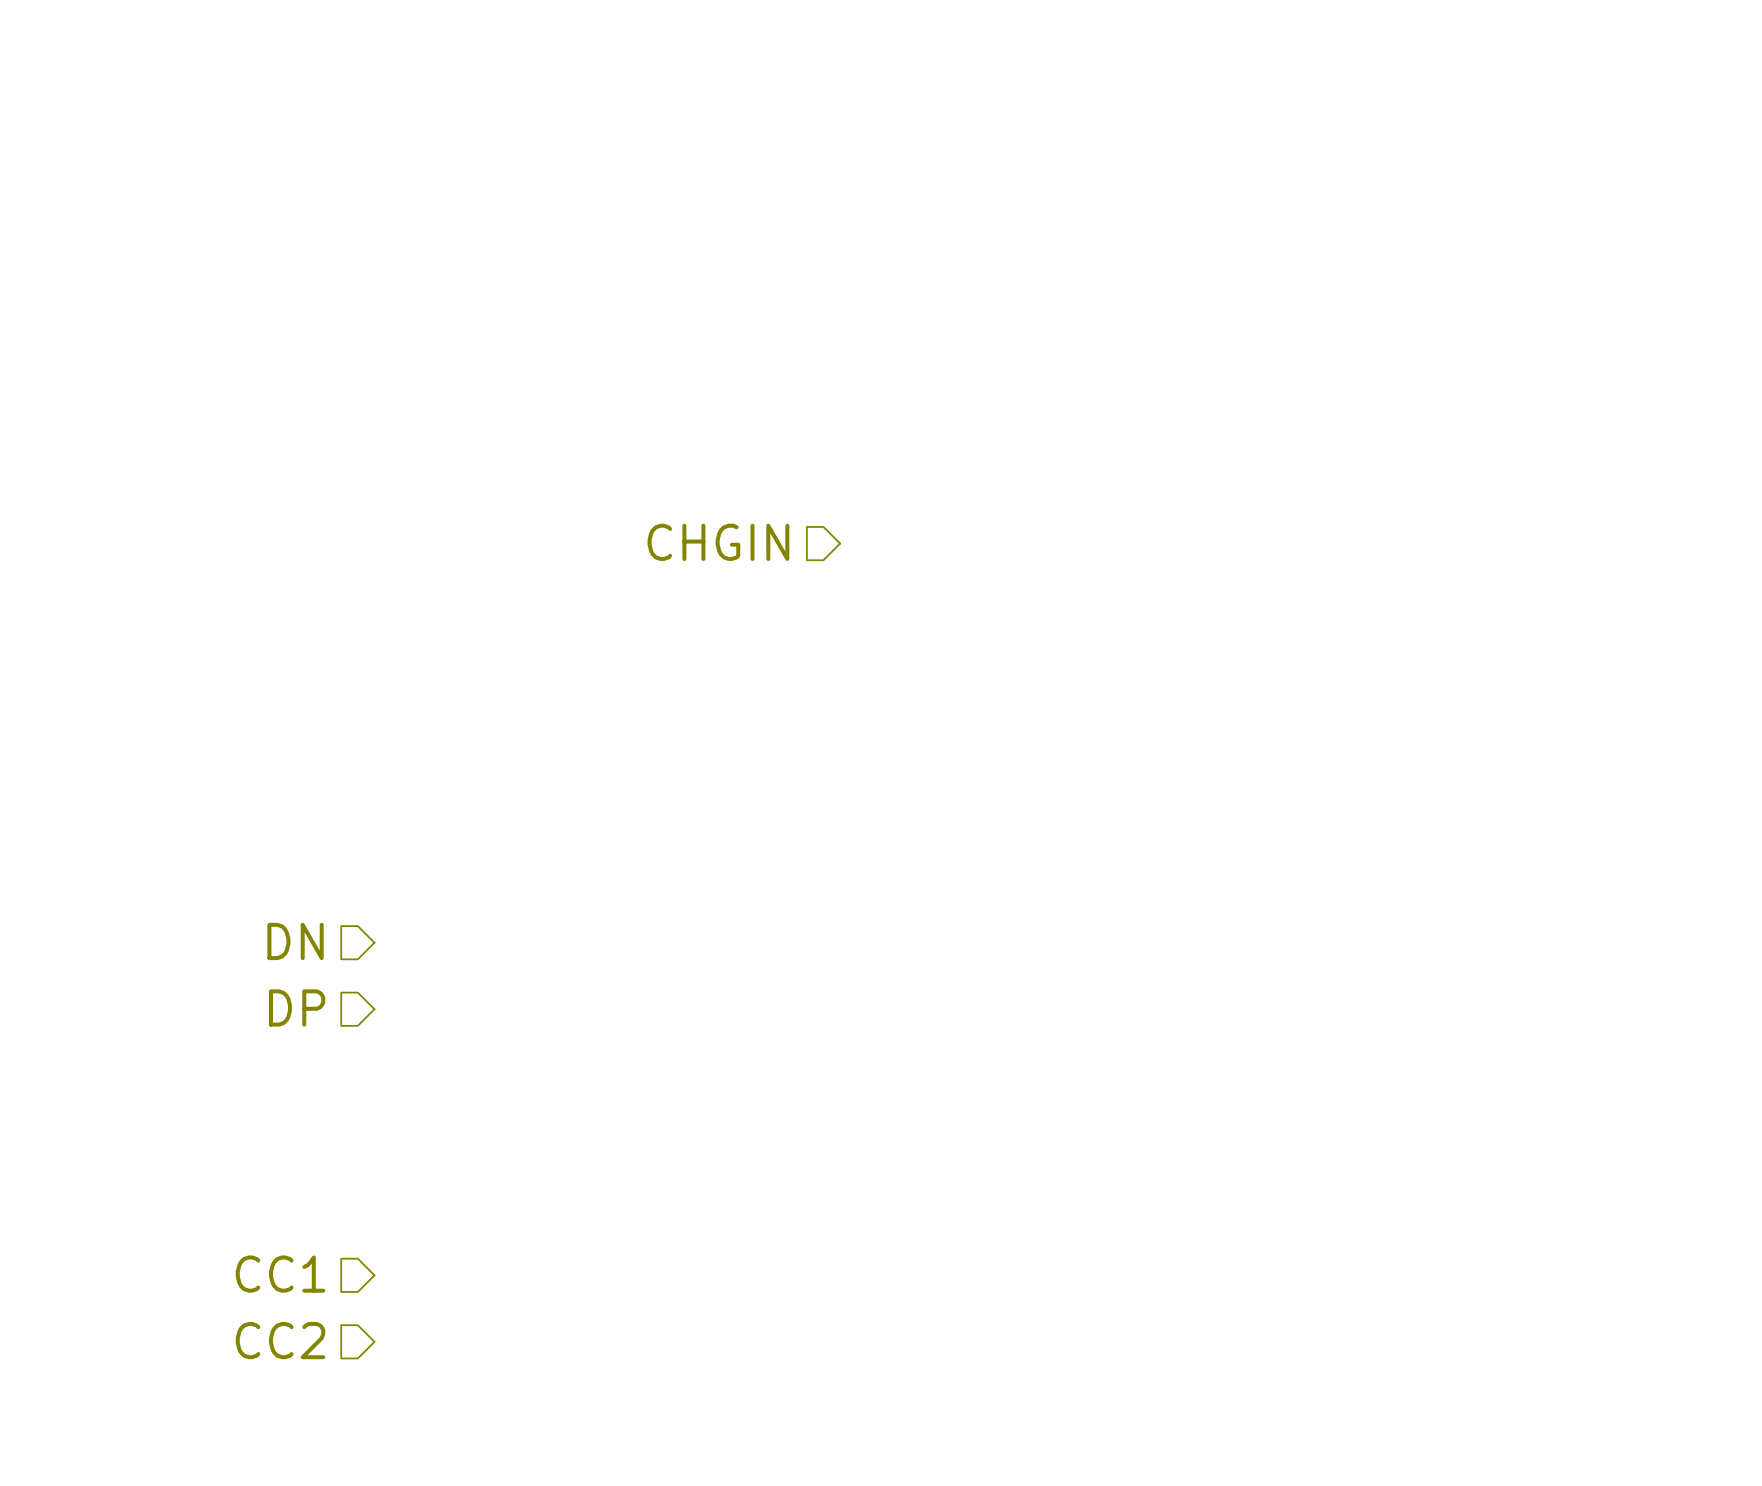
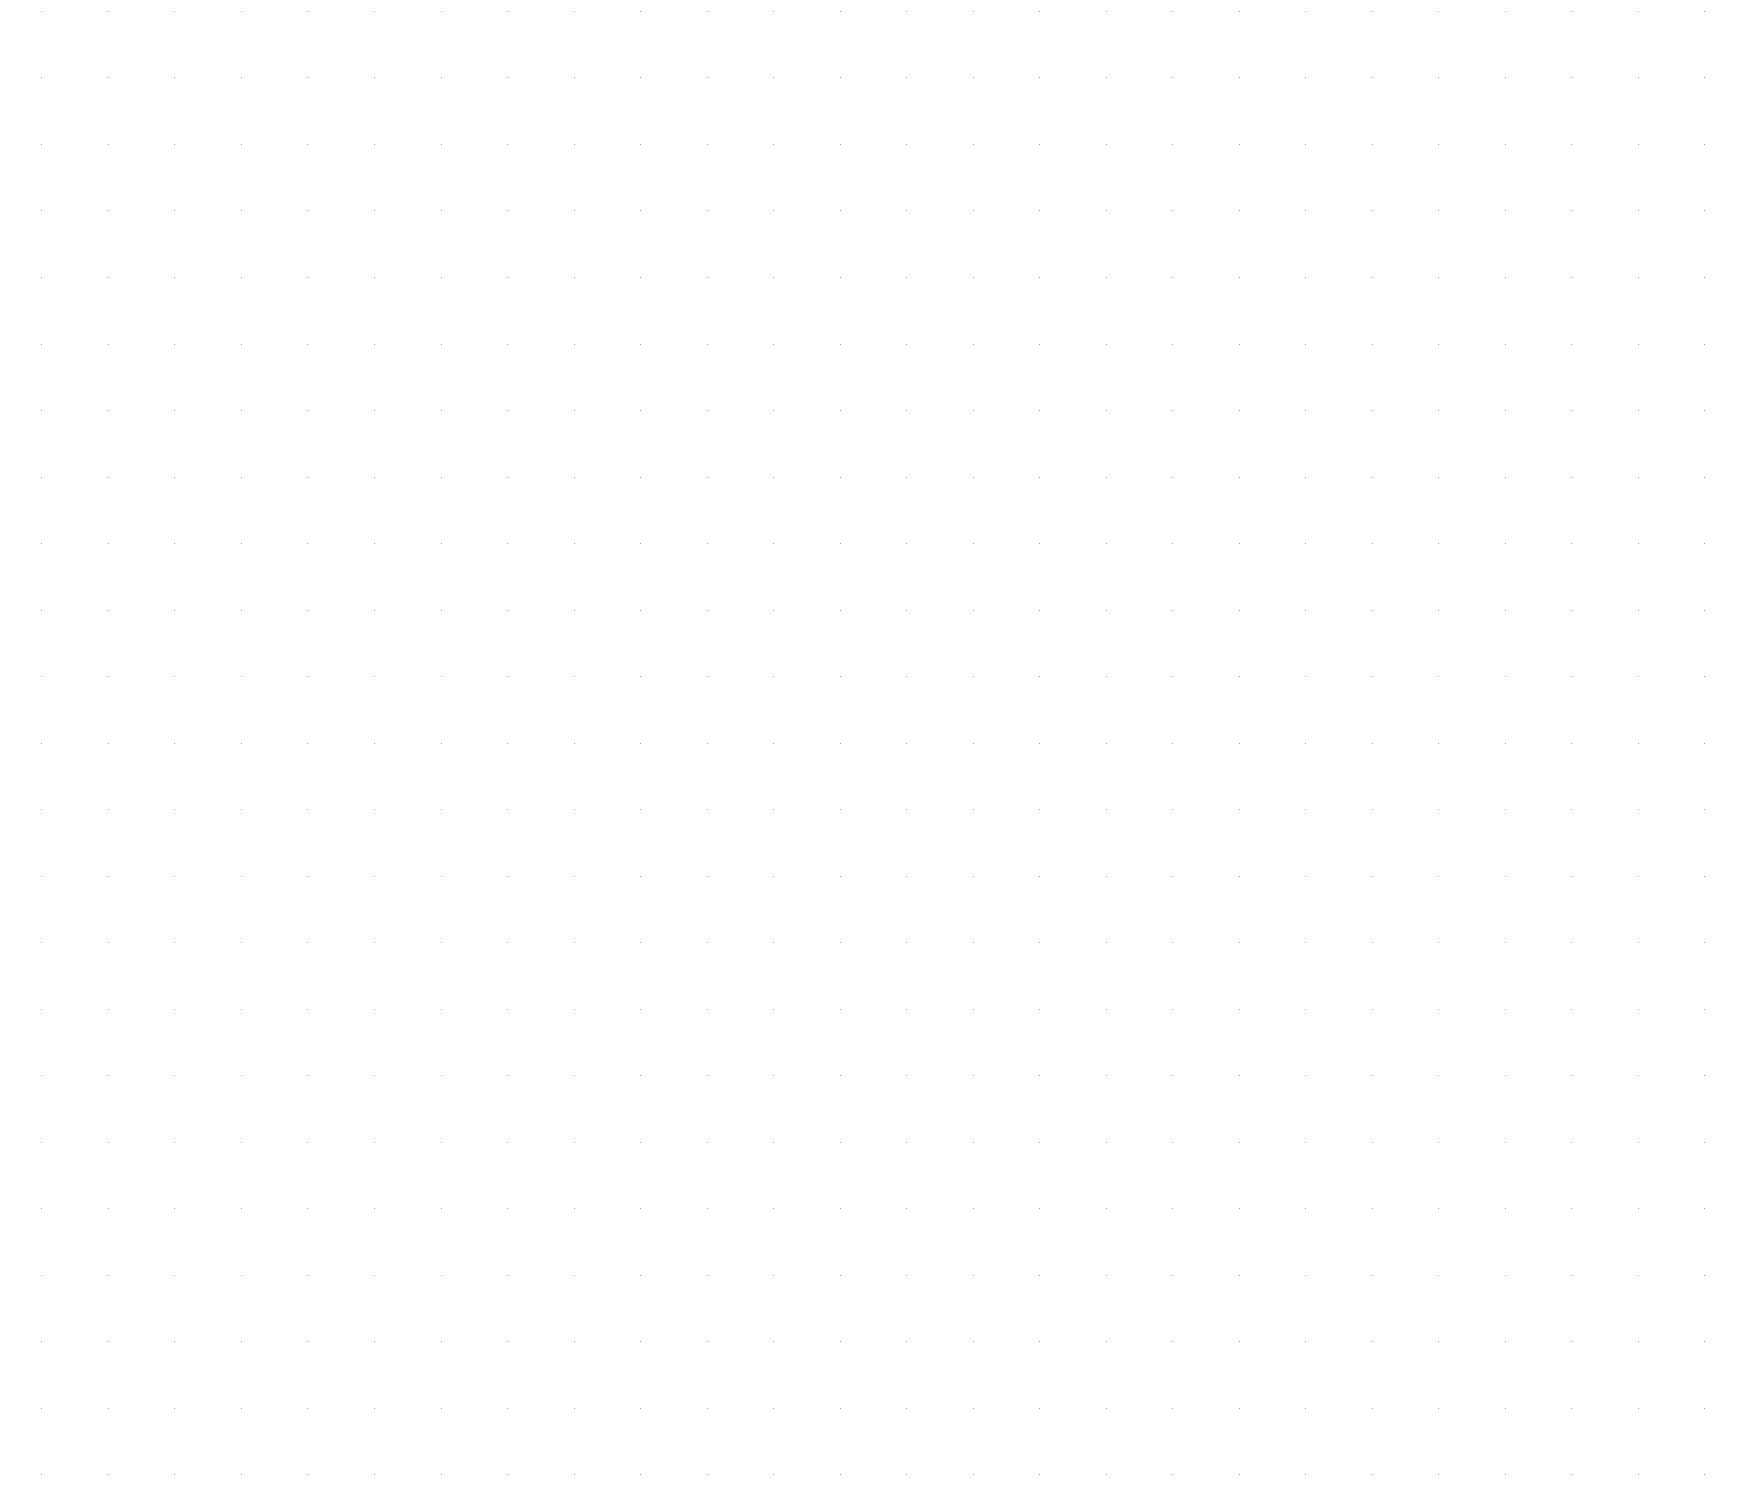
hierarchical label: CHGIN (718, 542) -> none
hierarchical label: DN (295, 941) -> none
hierarchical label: DP (297, 1007) -> none
hierarchical label: CC1 (280, 1274) -> none
hierarchical label: CC2 (280, 1340) -> none

